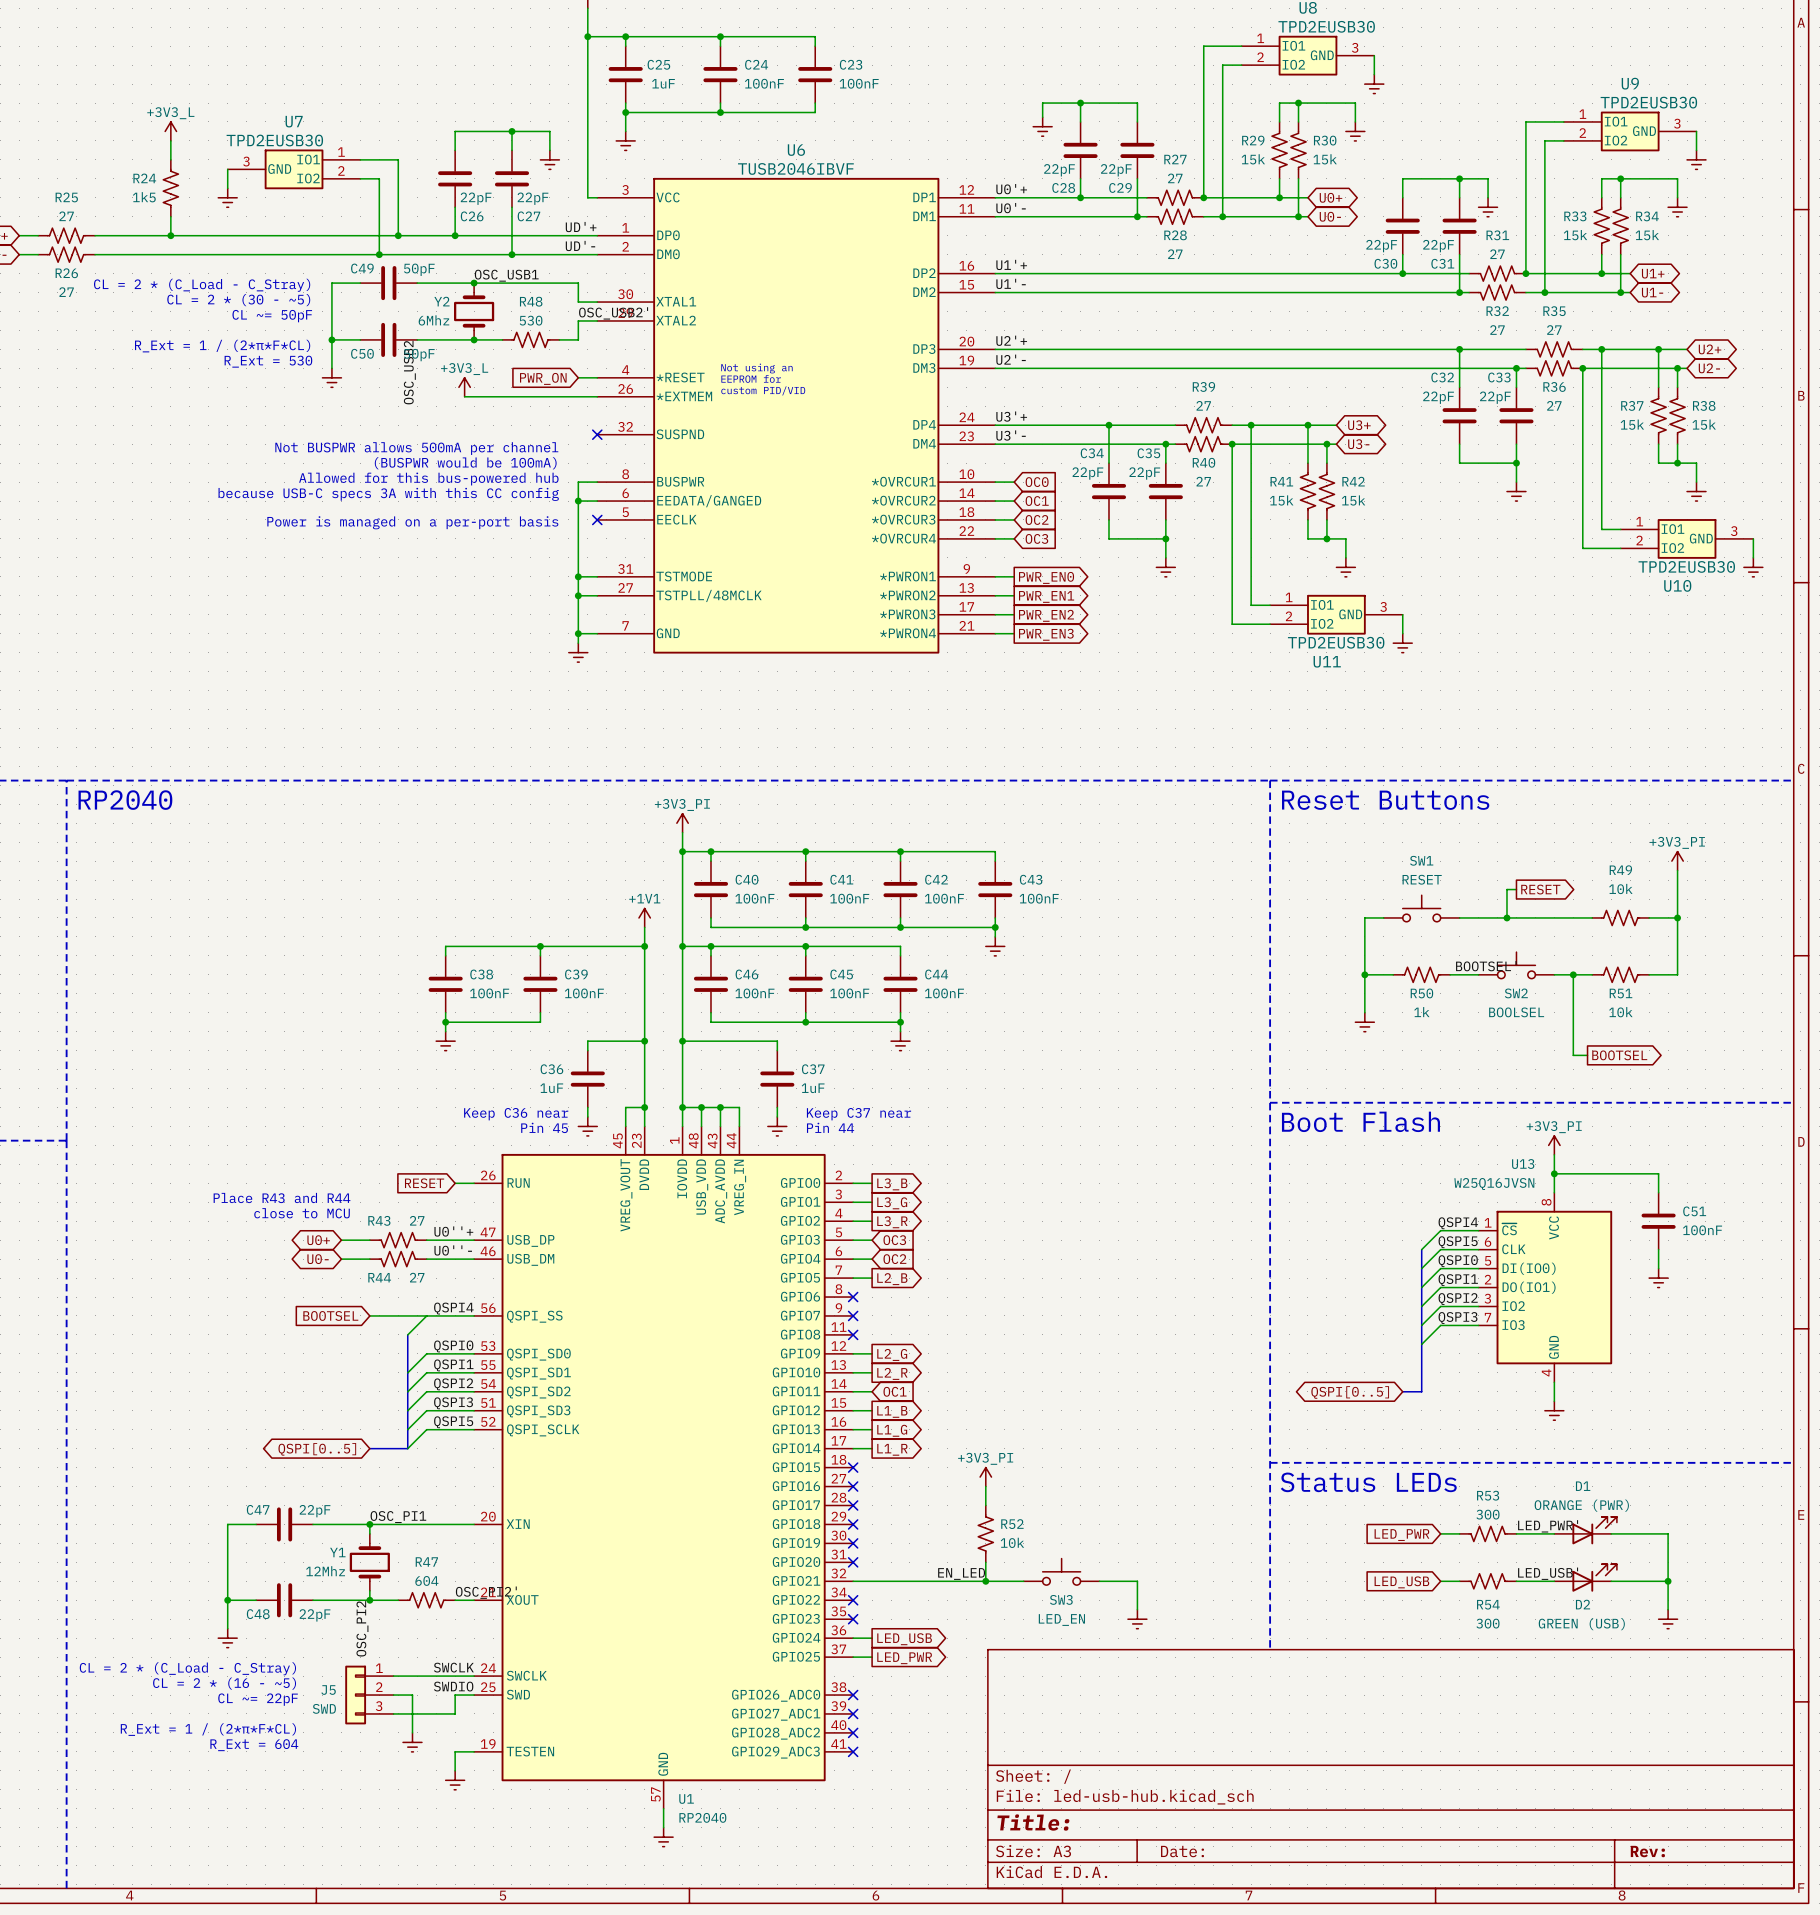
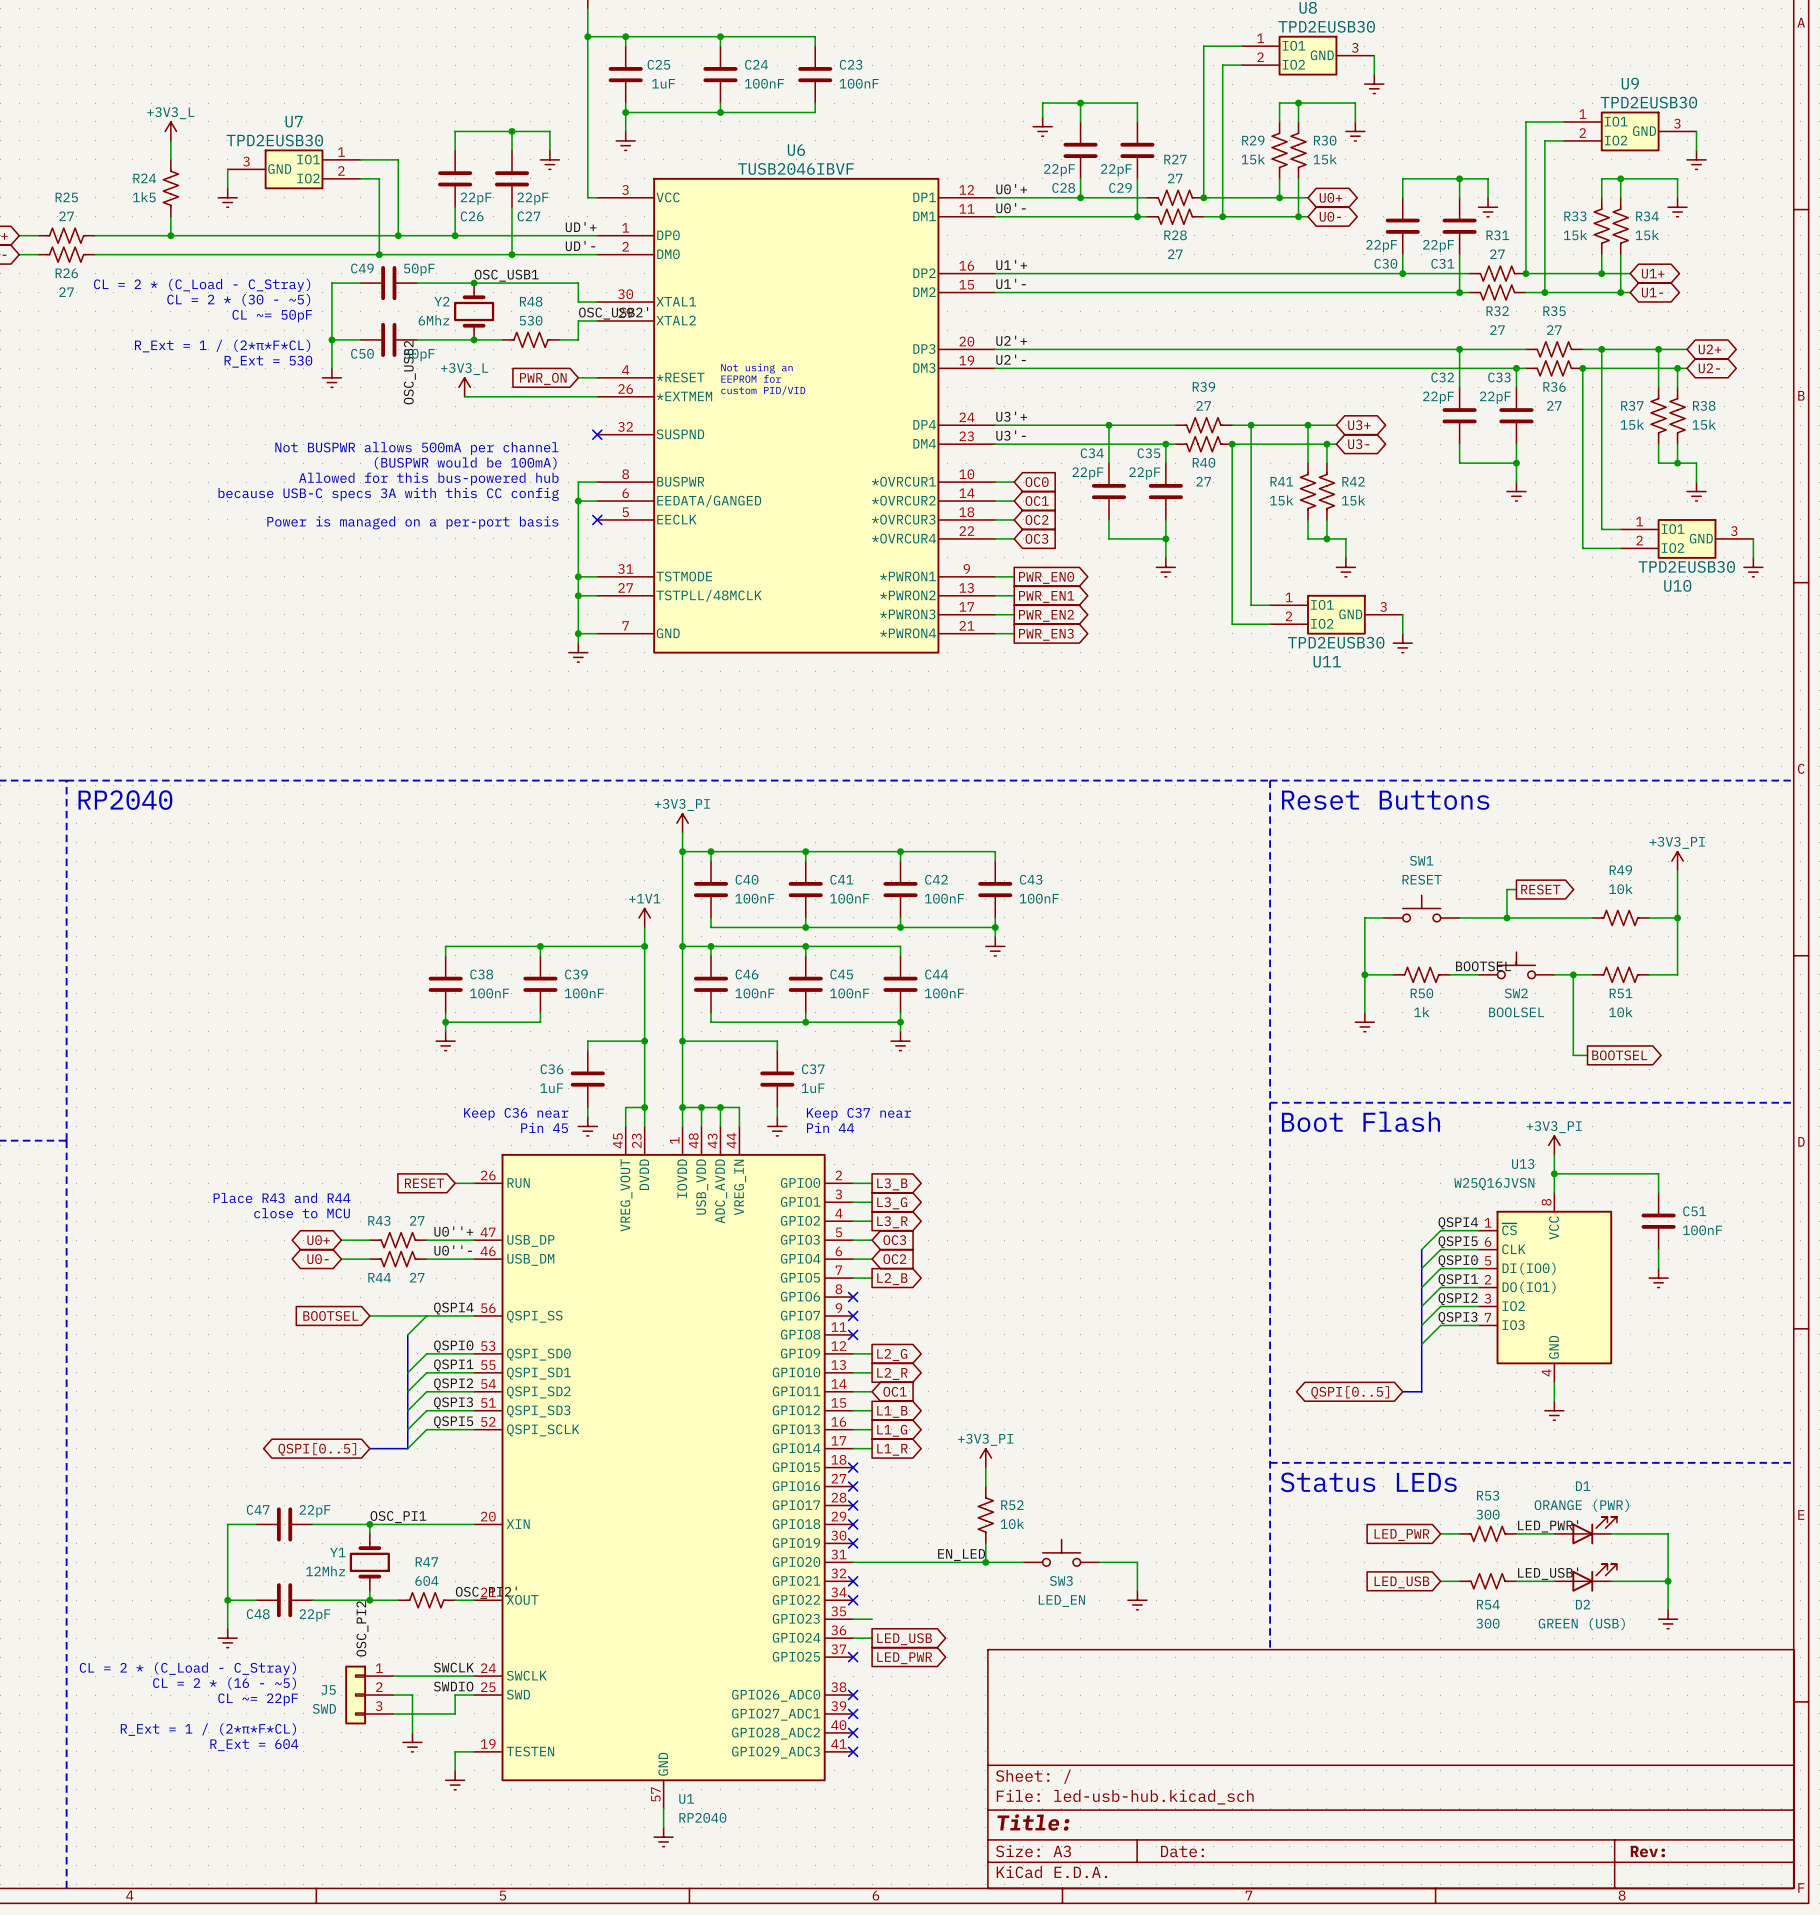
power symbol position: +3V3_PI (985, 1477) -> +3V3_PI (985, 1458)
R52 position: (985, 1533) -> (985, 1514)
no-connect mark: (853, 1562) -> none
SW3 position: (1061, 1571) -> (1061, 1552)
label position: EN_LED (961, 1574) -> EN_LED (961, 1555)
wire: (853, 1581) (1023, 1581) -> (853, 1562) (1023, 1562)
no-connect mark: none -> (853, 1581)
junction position: (985, 1581) -> (985, 1562)
wire: (1099, 1581) (1137, 1581) -> (1099, 1562) (1137, 1562) (1137, 1581)
no-connect mark: (853, 1619) -> none
power symbol position: (1137, 1619) -> (1137, 1600)
wire: (853, 1657) (872, 1657) -> (853, 1619) (872, 1619)
no-connect mark: none -> (853, 1657)

